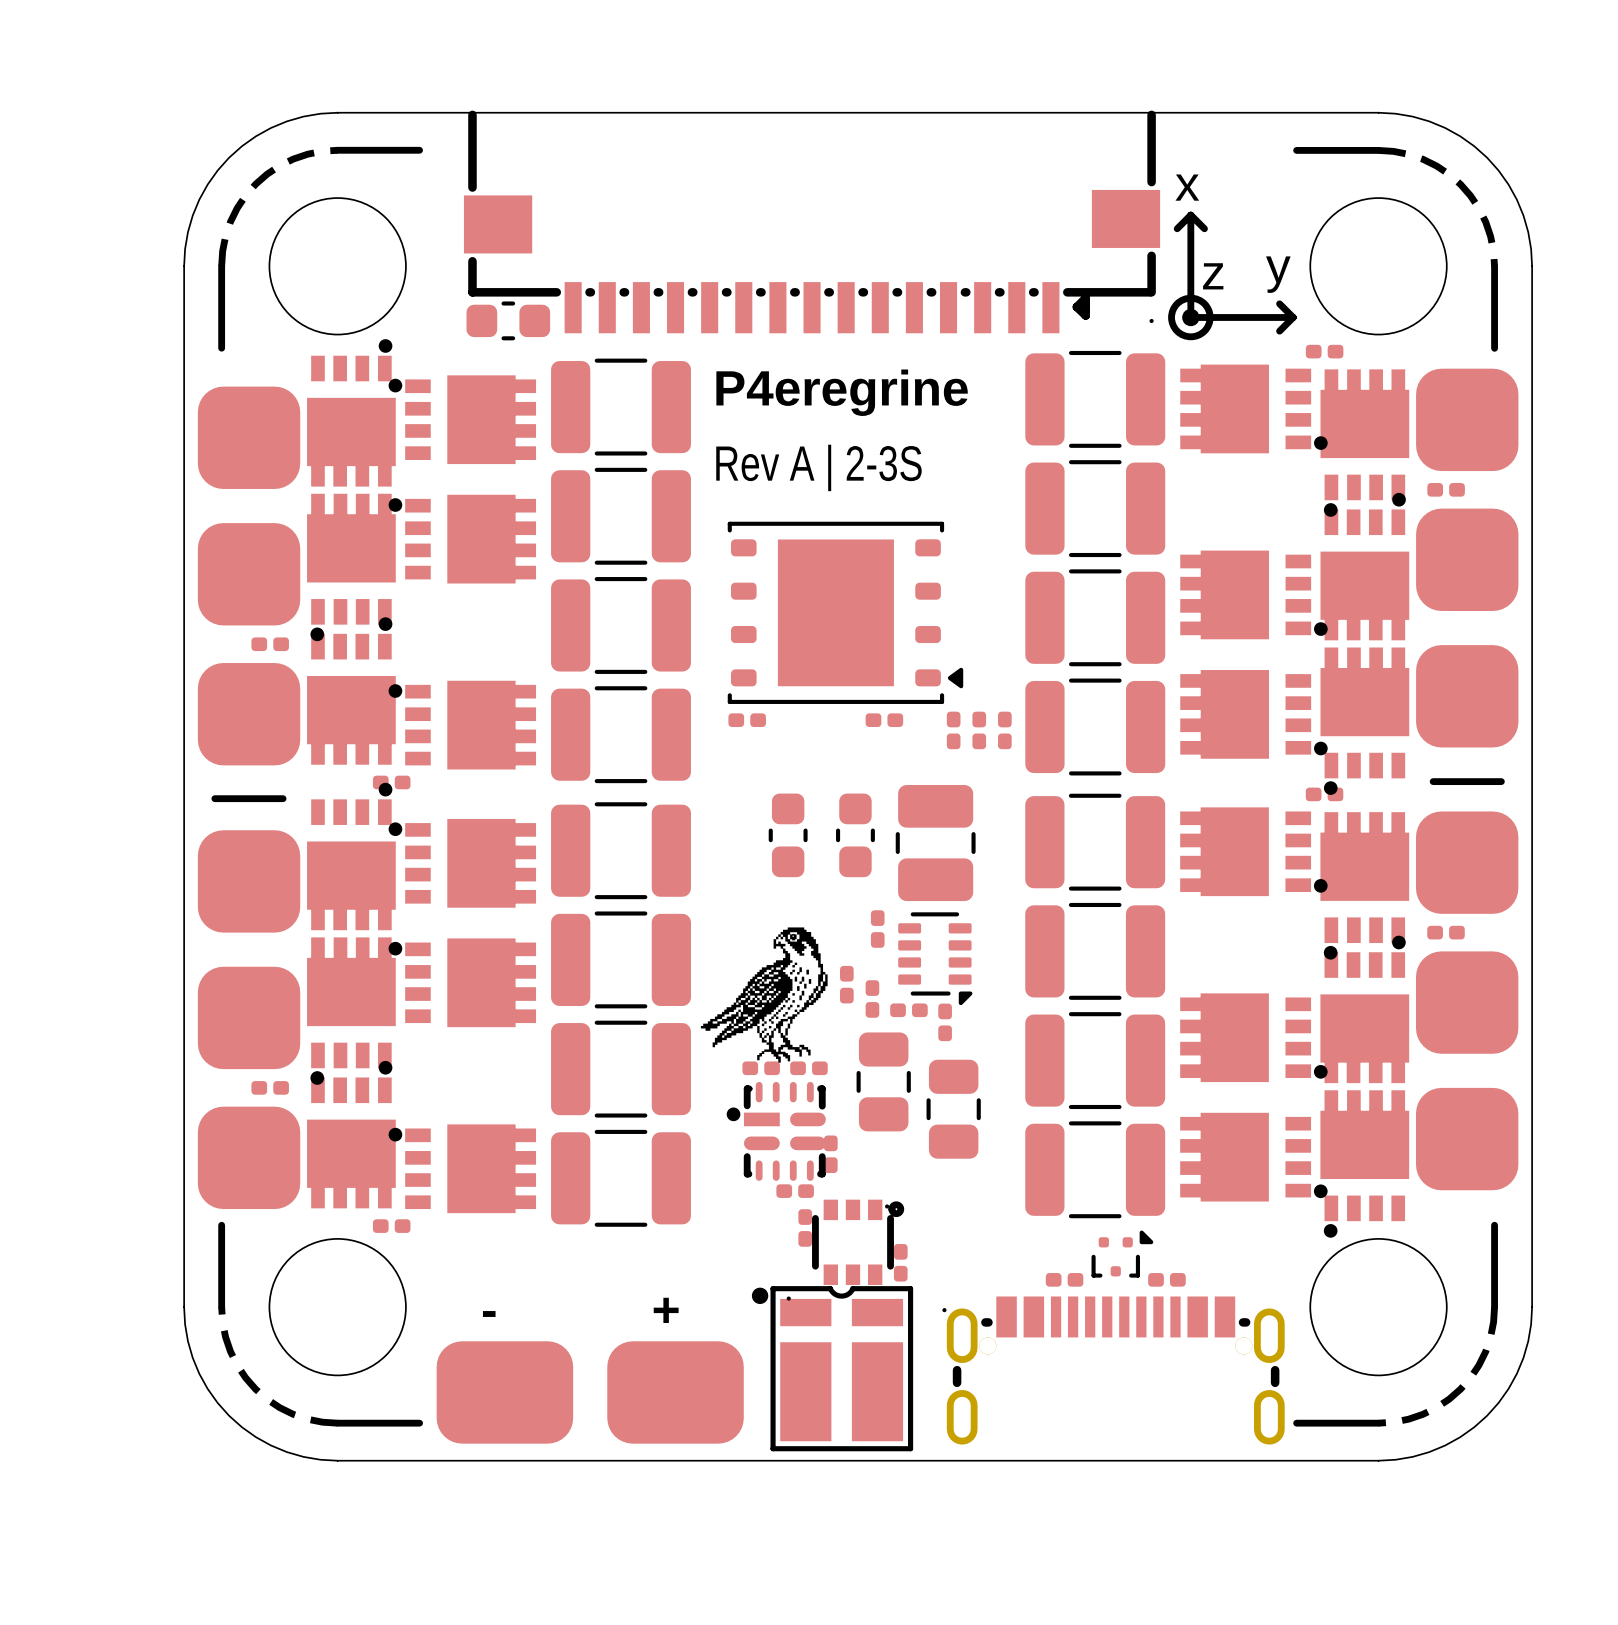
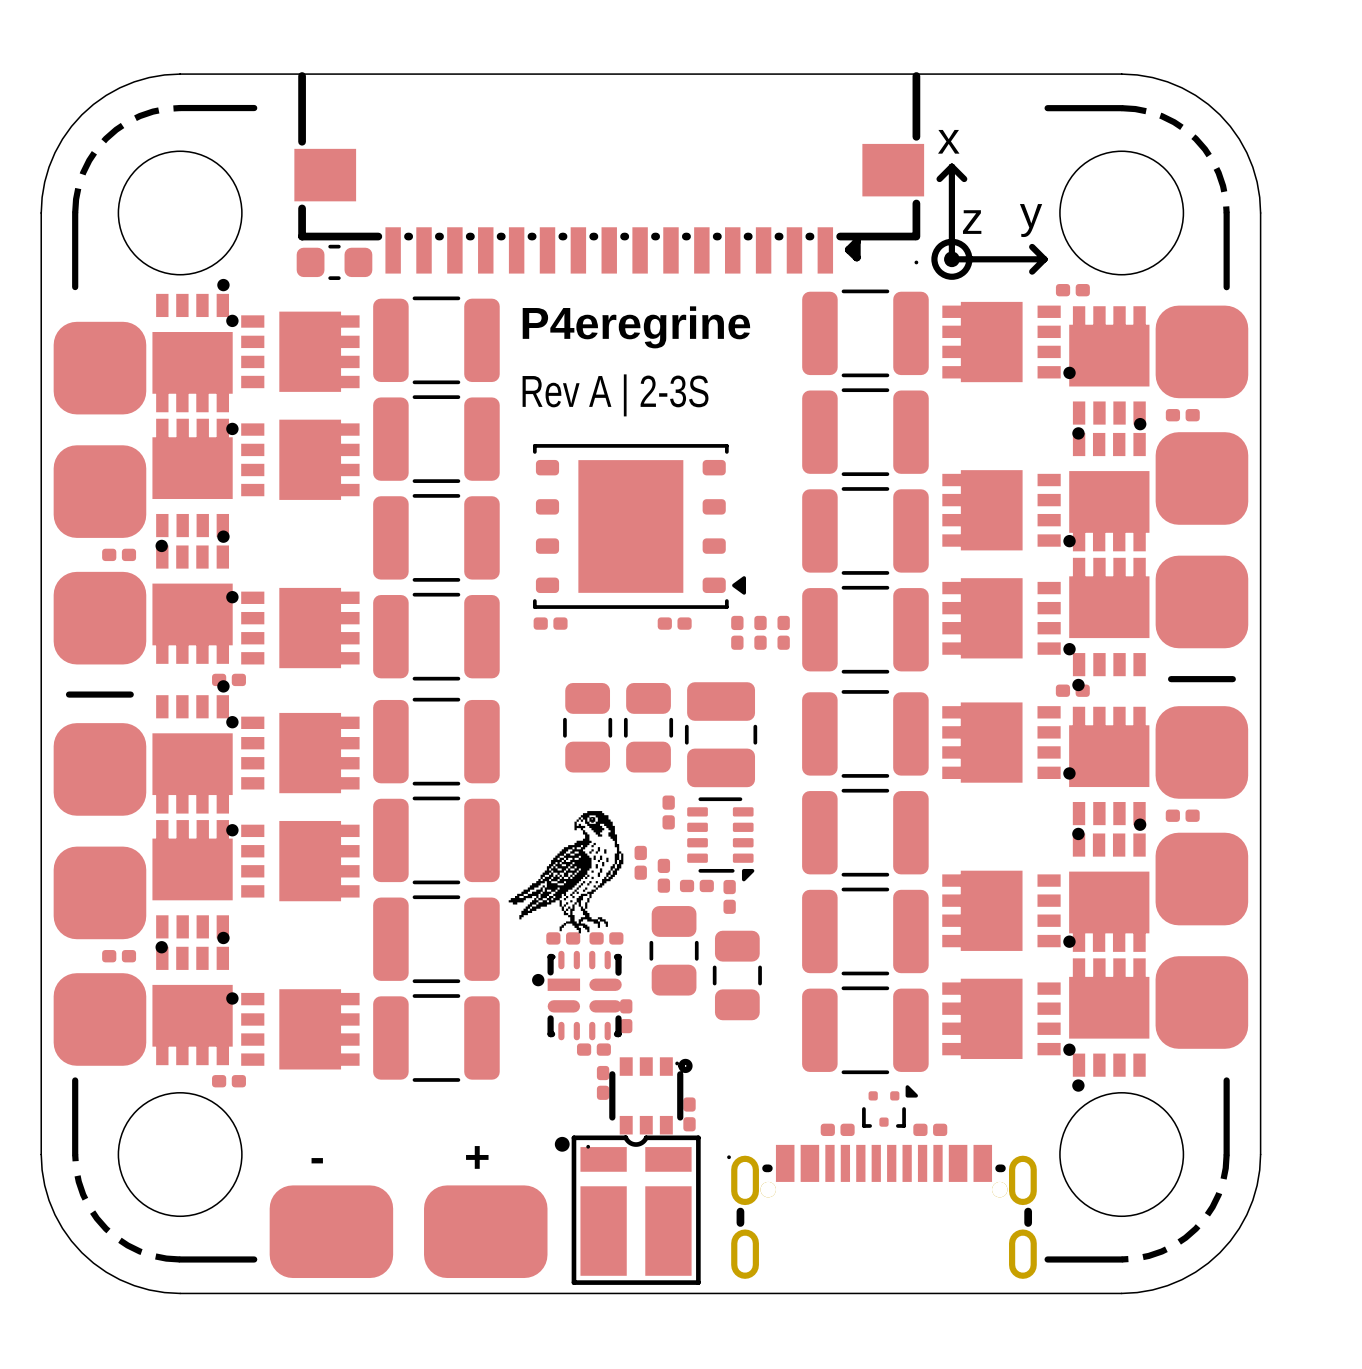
part footprint: [768, 793, 808, 878] -> [563, 682, 613, 773]
part footprint: [836, 793, 875, 878] -> [623, 682, 674, 773]

